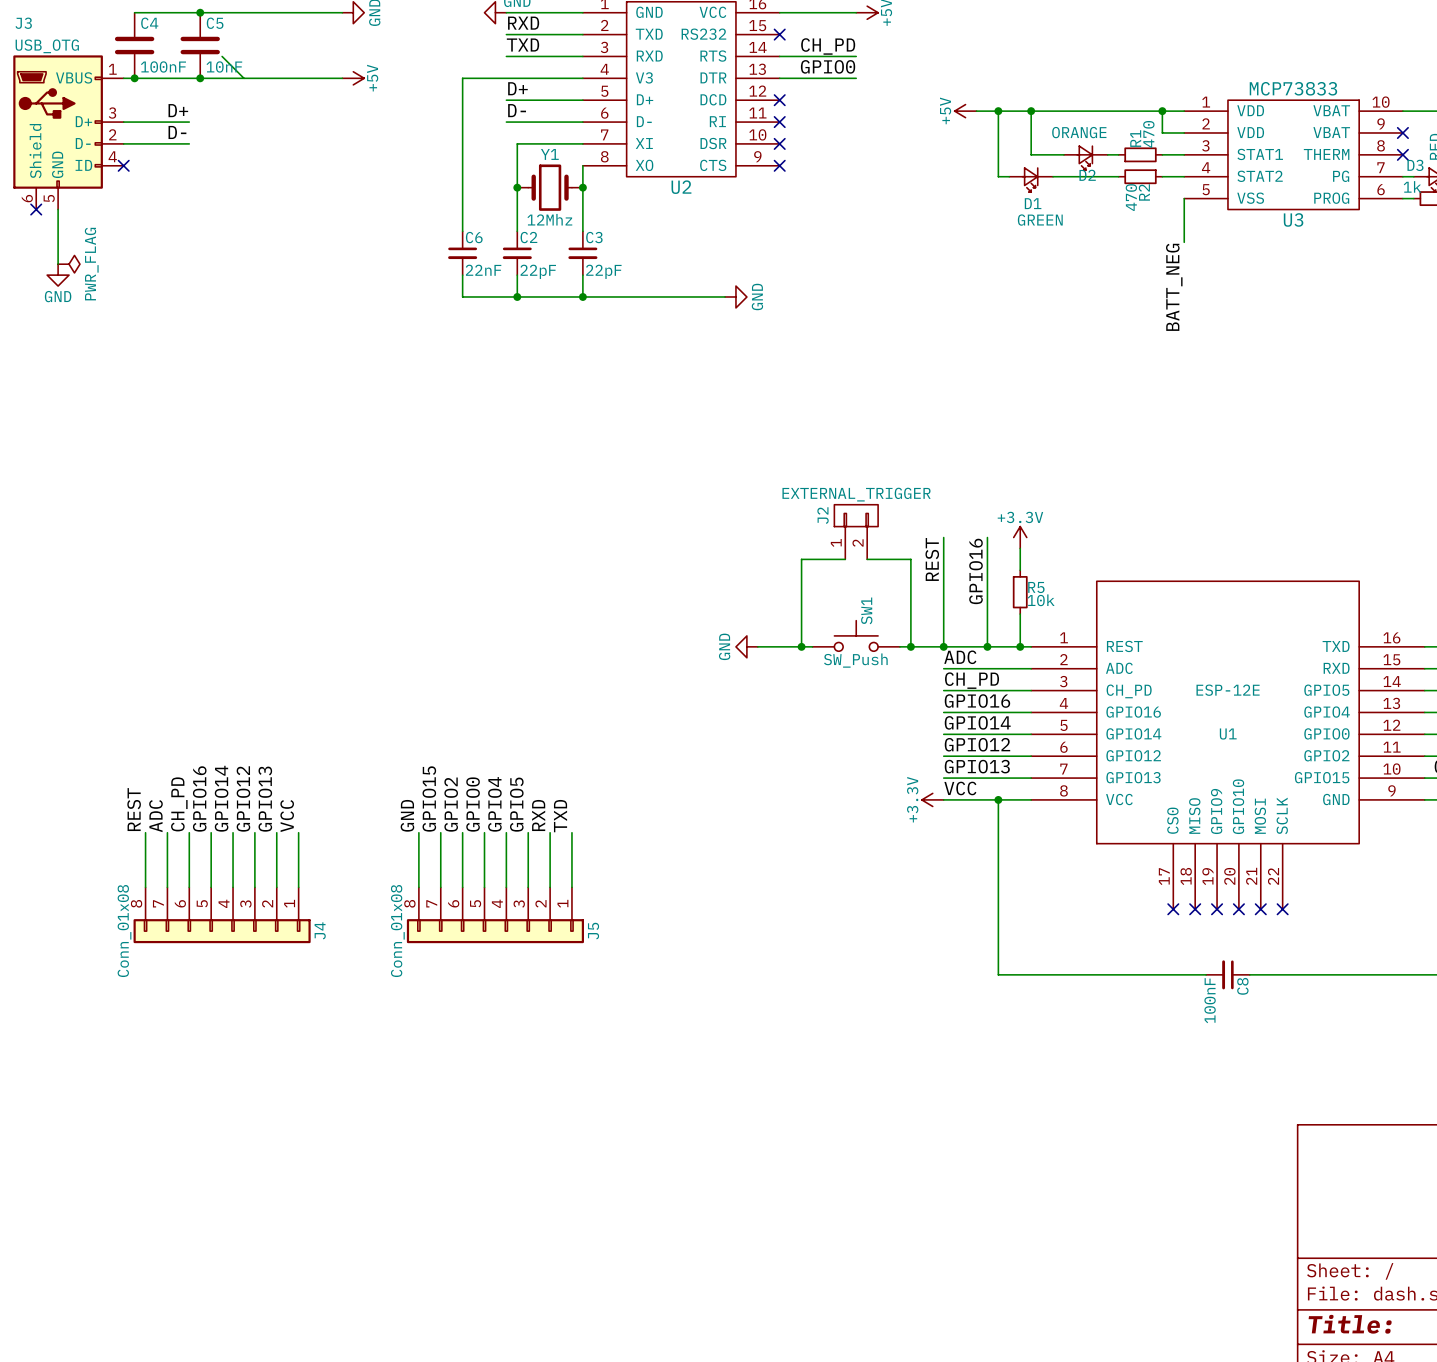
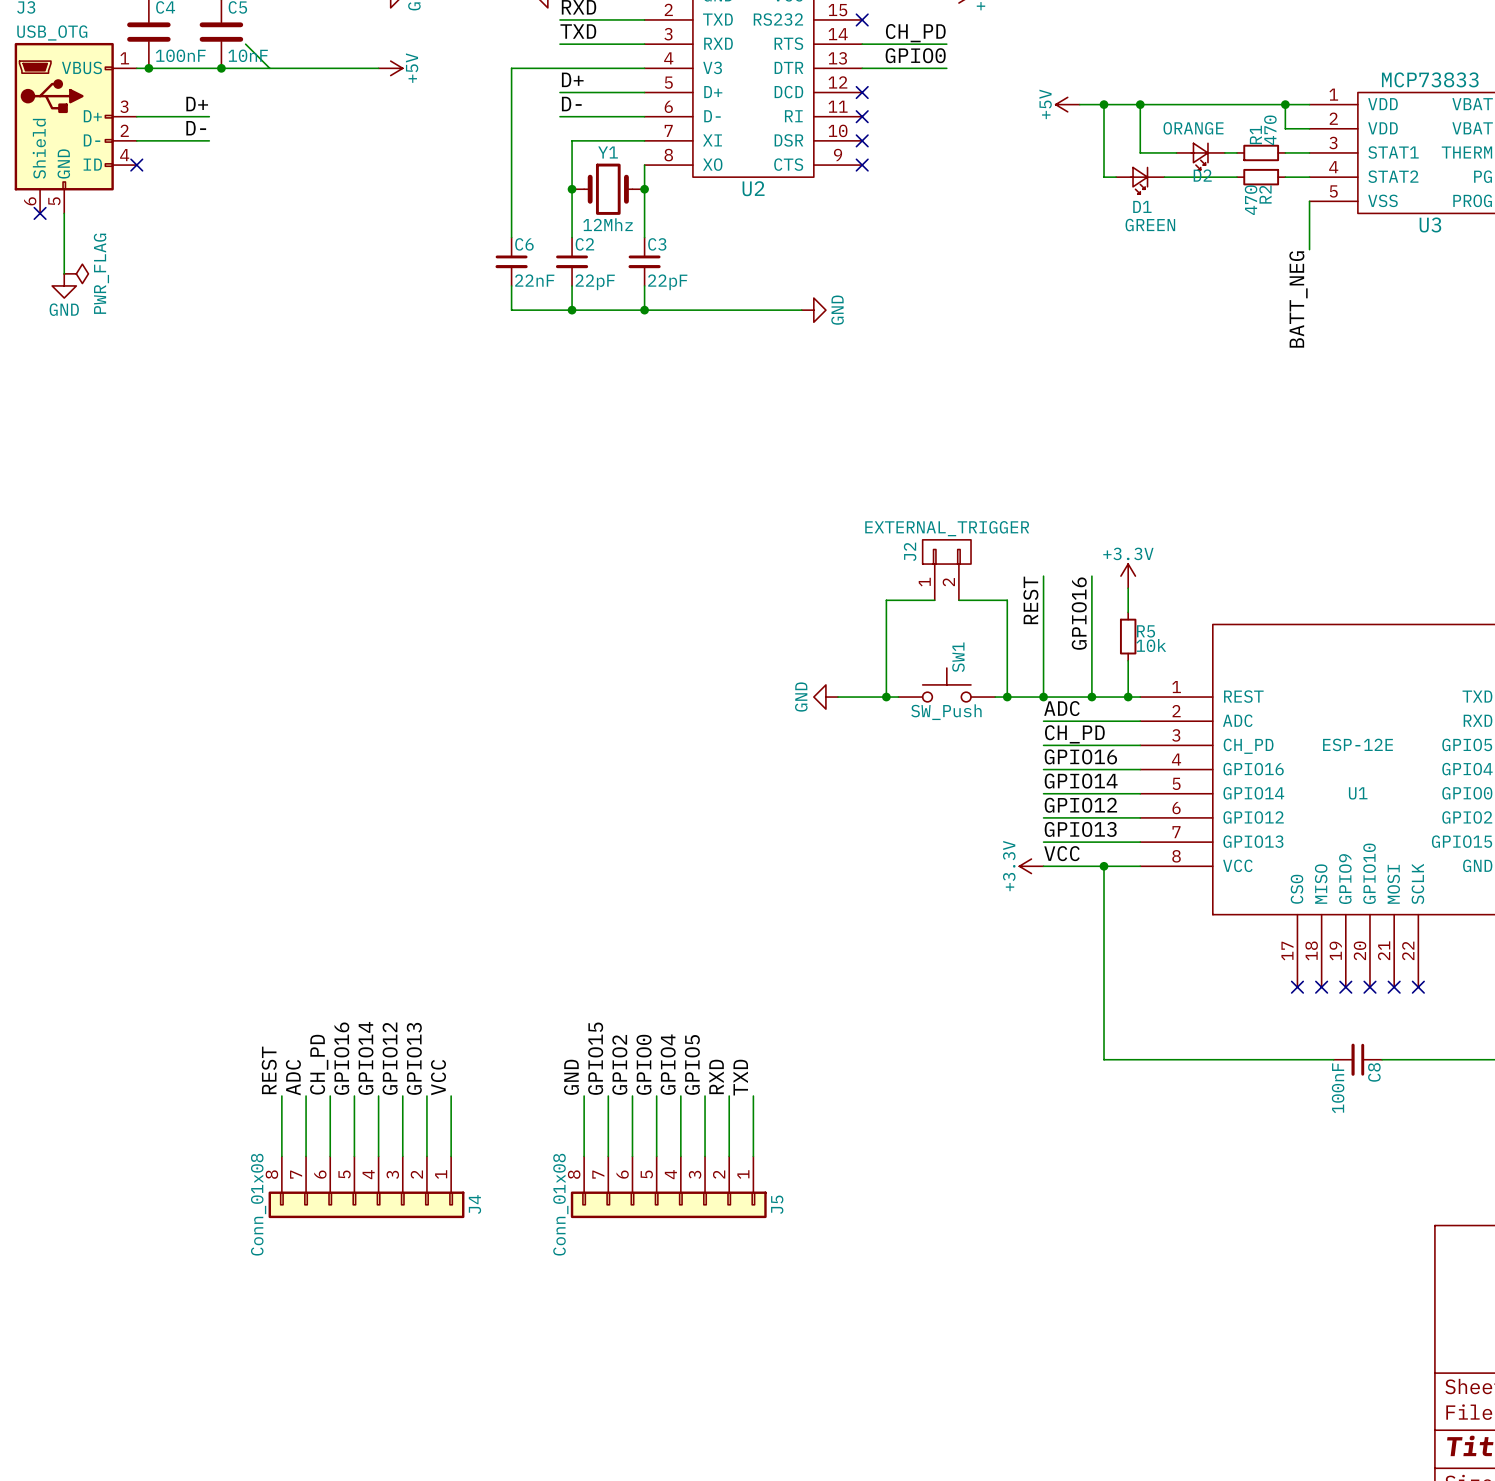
label position: GPIO16 (199, 798) -> GPIO16 (341, 1058)
label position: GPIO14 (221, 798) -> GPIO14 (365, 1058)
label position: GPIO12 (243, 798) -> GPIO12 (390, 1058)
label position: GPIO13 (265, 799) -> GPIO13 (414, 1058)
label position: GPIO15 (429, 799) -> GPIO15 (595, 1058)
label position: CH_PD (179, 804) -> CH_PD (319, 1064)
label position: GPIO2 (451, 804) -> GPIO2 (619, 1064)
label position: GPIO0 (473, 804) -> GPIO0 (644, 1064)
label position: GPIO4 (494, 804) -> GPIO4 (668, 1064)
label position: GPIO5 (516, 804) -> GPIO5 (692, 1064)
label position: REST (134, 809) -> REST (269, 1070)
label position: GND (407, 815) -> GND (571, 1077)
label position: RXD (538, 815) -> RXD (716, 1076)
label position: ADC (155, 816) -> ADC (293, 1077)
label position: VCC (287, 816) -> VCC (438, 1077)
label position: TXD (560, 816) -> TXD (740, 1077)
wire: (145, 832) (145, 887) -> (281, 1096) (281, 1156)
wire: (167, 832) (167, 887) -> (306, 1096) (306, 1156)
wire: (189, 832) (189, 887) -> (330, 1096) (330, 1156)
wire: (211, 832) (211, 887) -> (354, 1096) (354, 1156)
wire: (233, 832) (233, 887) -> (378, 1096) (378, 1156)
wire: (254, 832) (254, 887) -> (402, 1096) (402, 1156)
wire: (276, 832) (276, 887) -> (426, 1096) (426, 1156)
wire: (298, 832) (298, 887) -> (451, 1096) (451, 1156)
wire: (418, 832) (418, 887) -> (584, 1096) (584, 1156)
wire: (440, 832) (440, 887) -> (608, 1096) (608, 1156)
wire: (462, 832) (462, 887) -> (632, 1096) (632, 1156)
wire: (484, 832) (484, 887) -> (656, 1096) (656, 1156)
wire: (506, 832) (506, 887) -> (680, 1096) (680, 1156)
wire: (528, 832) (528, 887) -> (705, 1096) (705, 1156)
wire: (550, 832) (550, 887) -> (729, 1096) (729, 1156)
wire: (571, 832) (571, 887) -> (753, 1096) (753, 1156)
J4 position: (222, 915) -> (366, 1187)
J5 position: (495, 915) -> (668, 1187)

